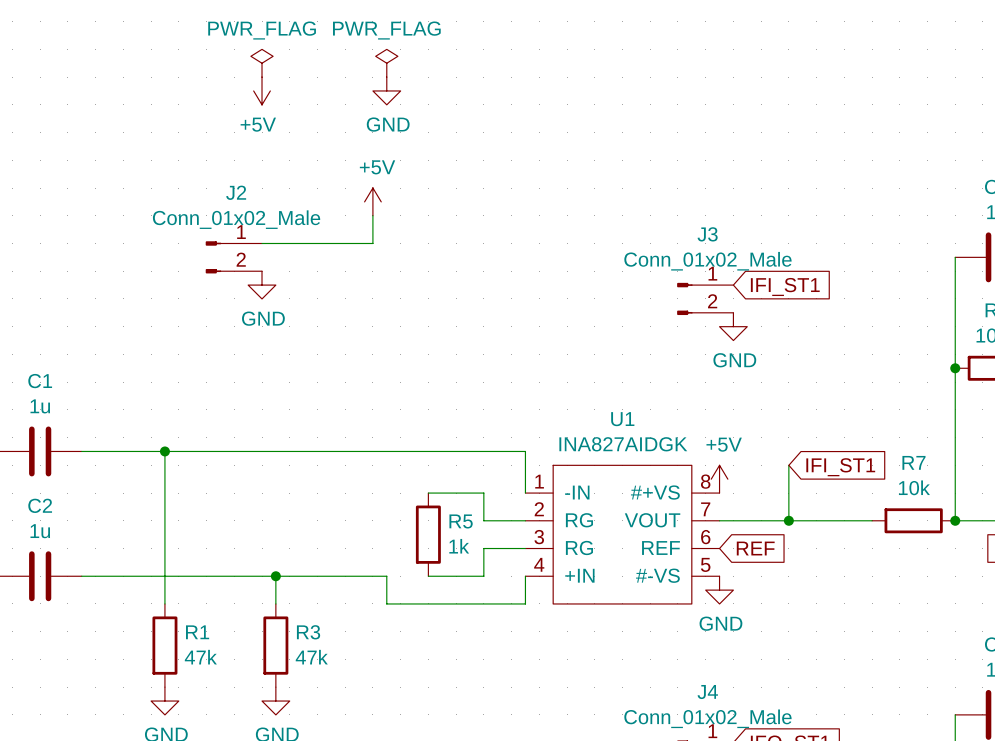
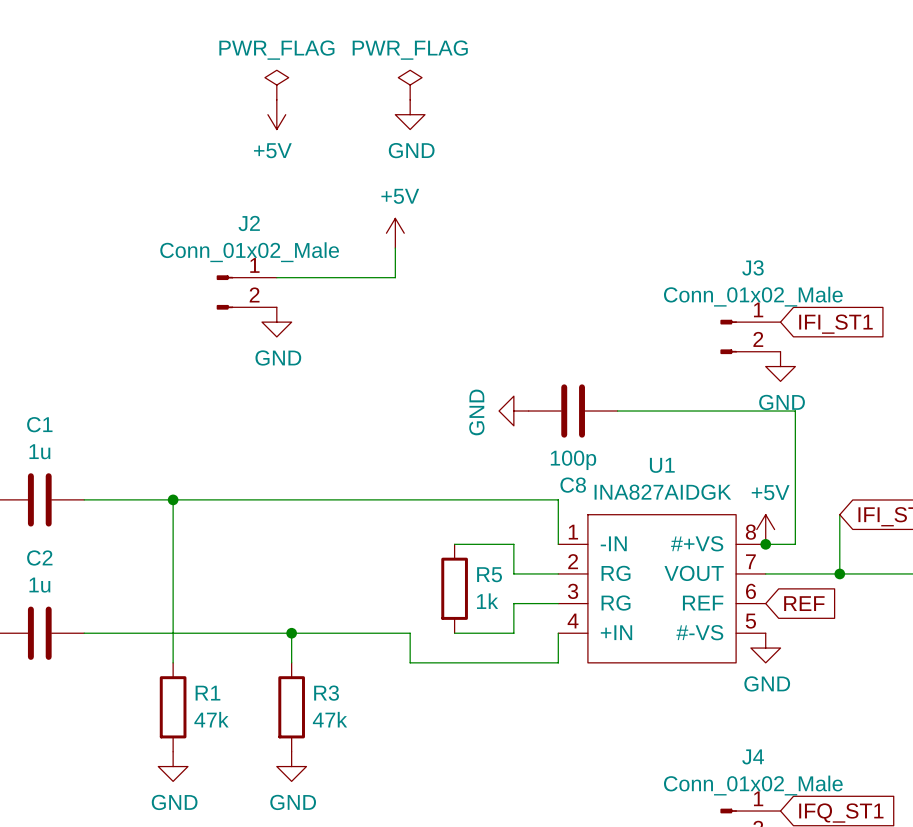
power symbol: none -> GND (513, 411)
C8: none -> 100p (573, 411)
wire: none -> (617, 411) (795, 411) (795, 544) (765, 544)
junction: none -> (765, 544)

